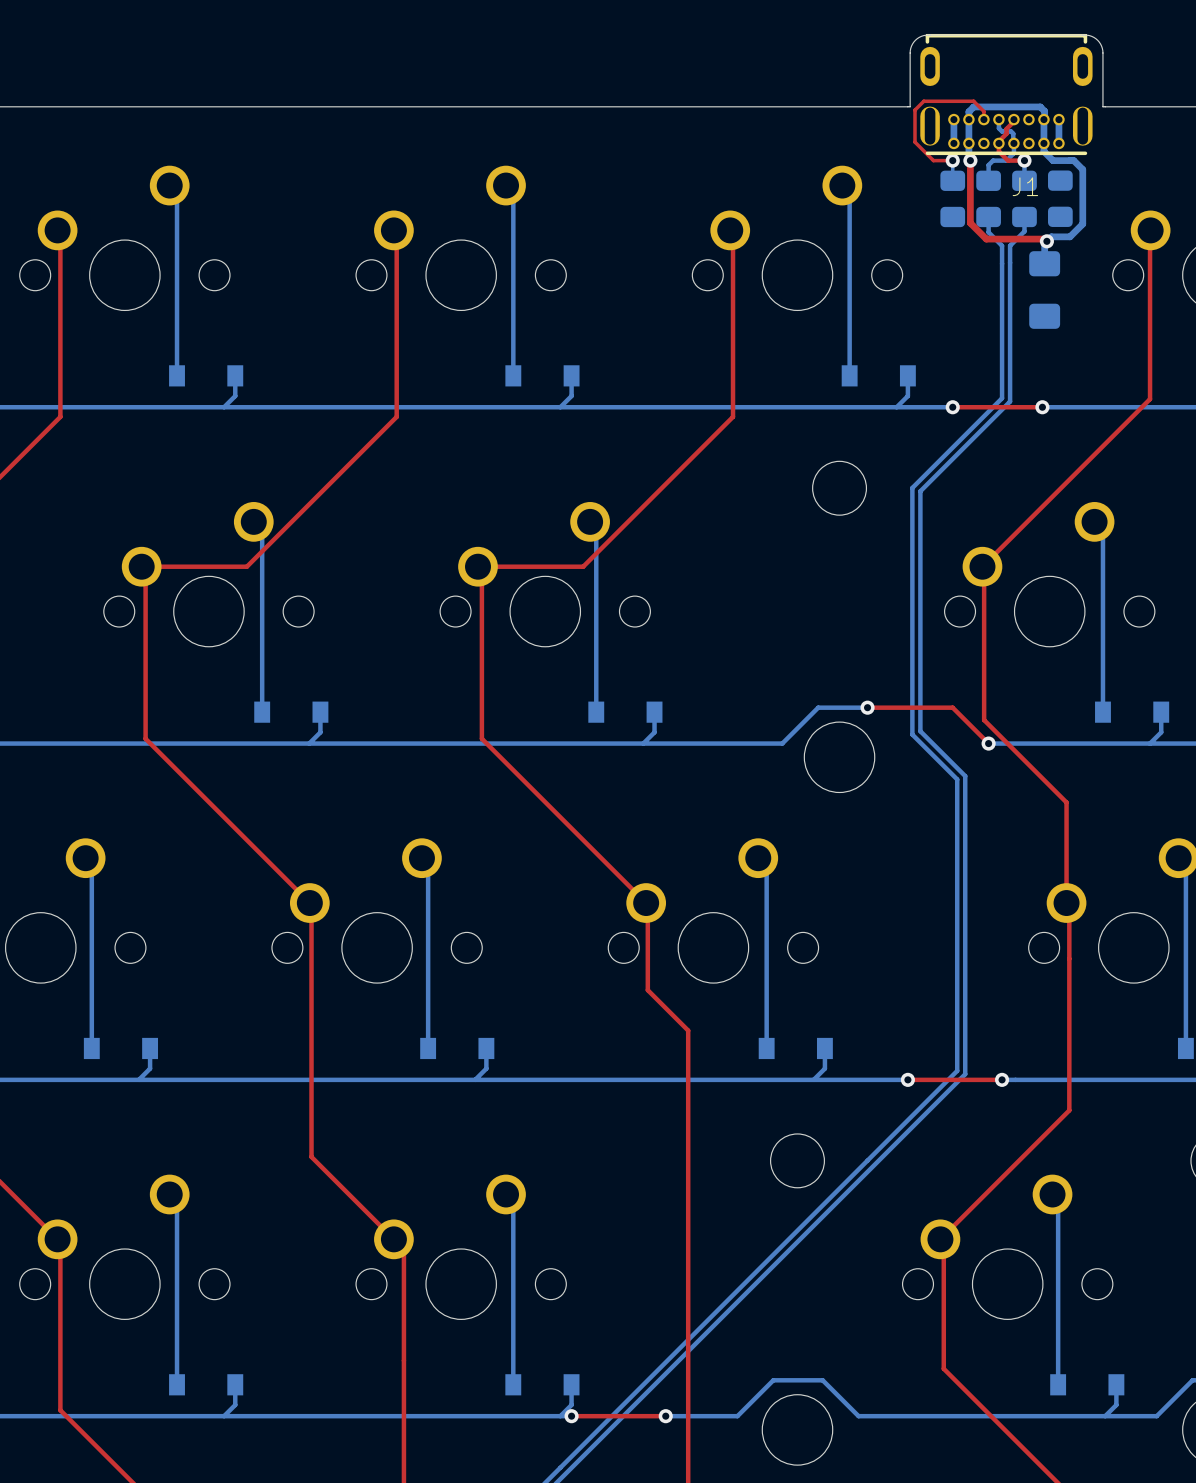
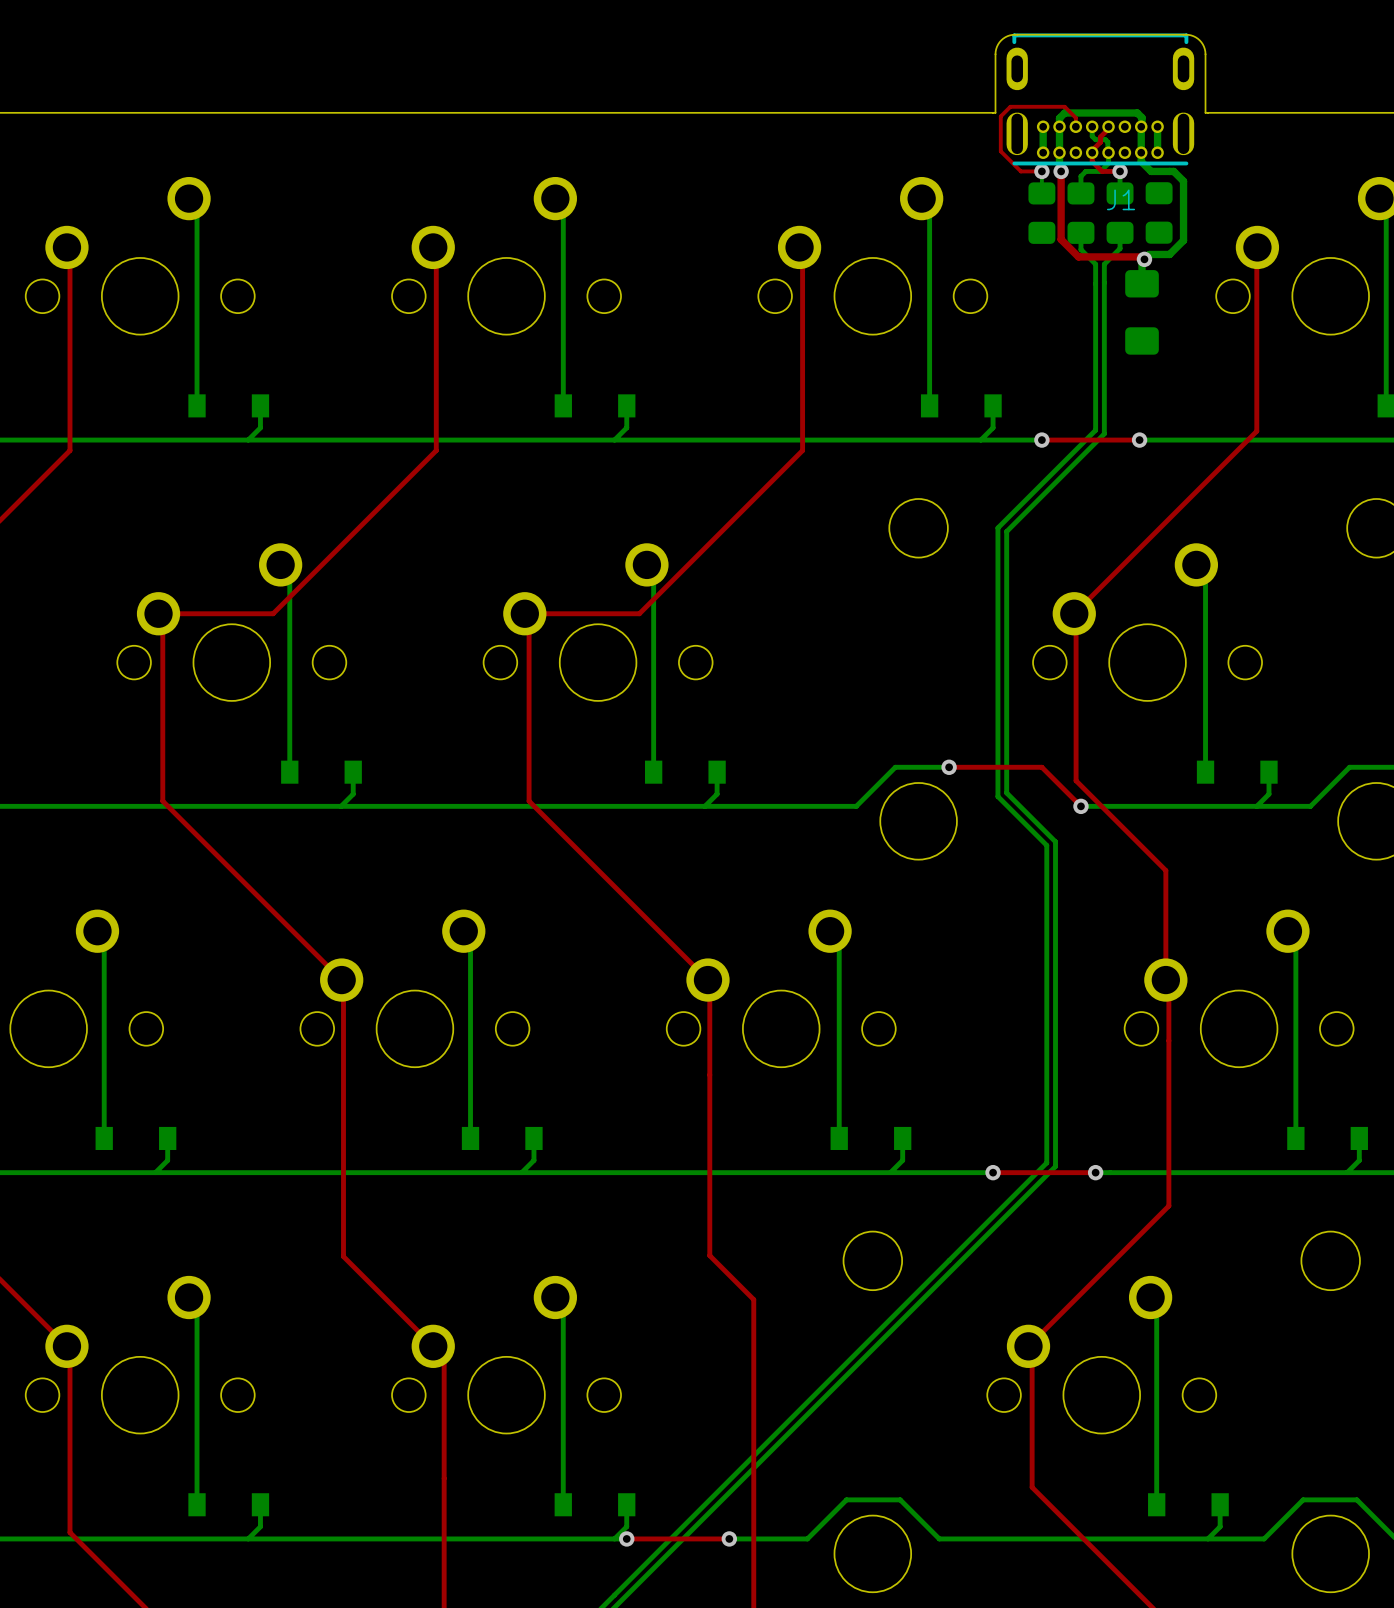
top track: (647, 990) (688, 1030) (688, 1196) -> (709, 1074) (709, 1255) (753, 1299)

